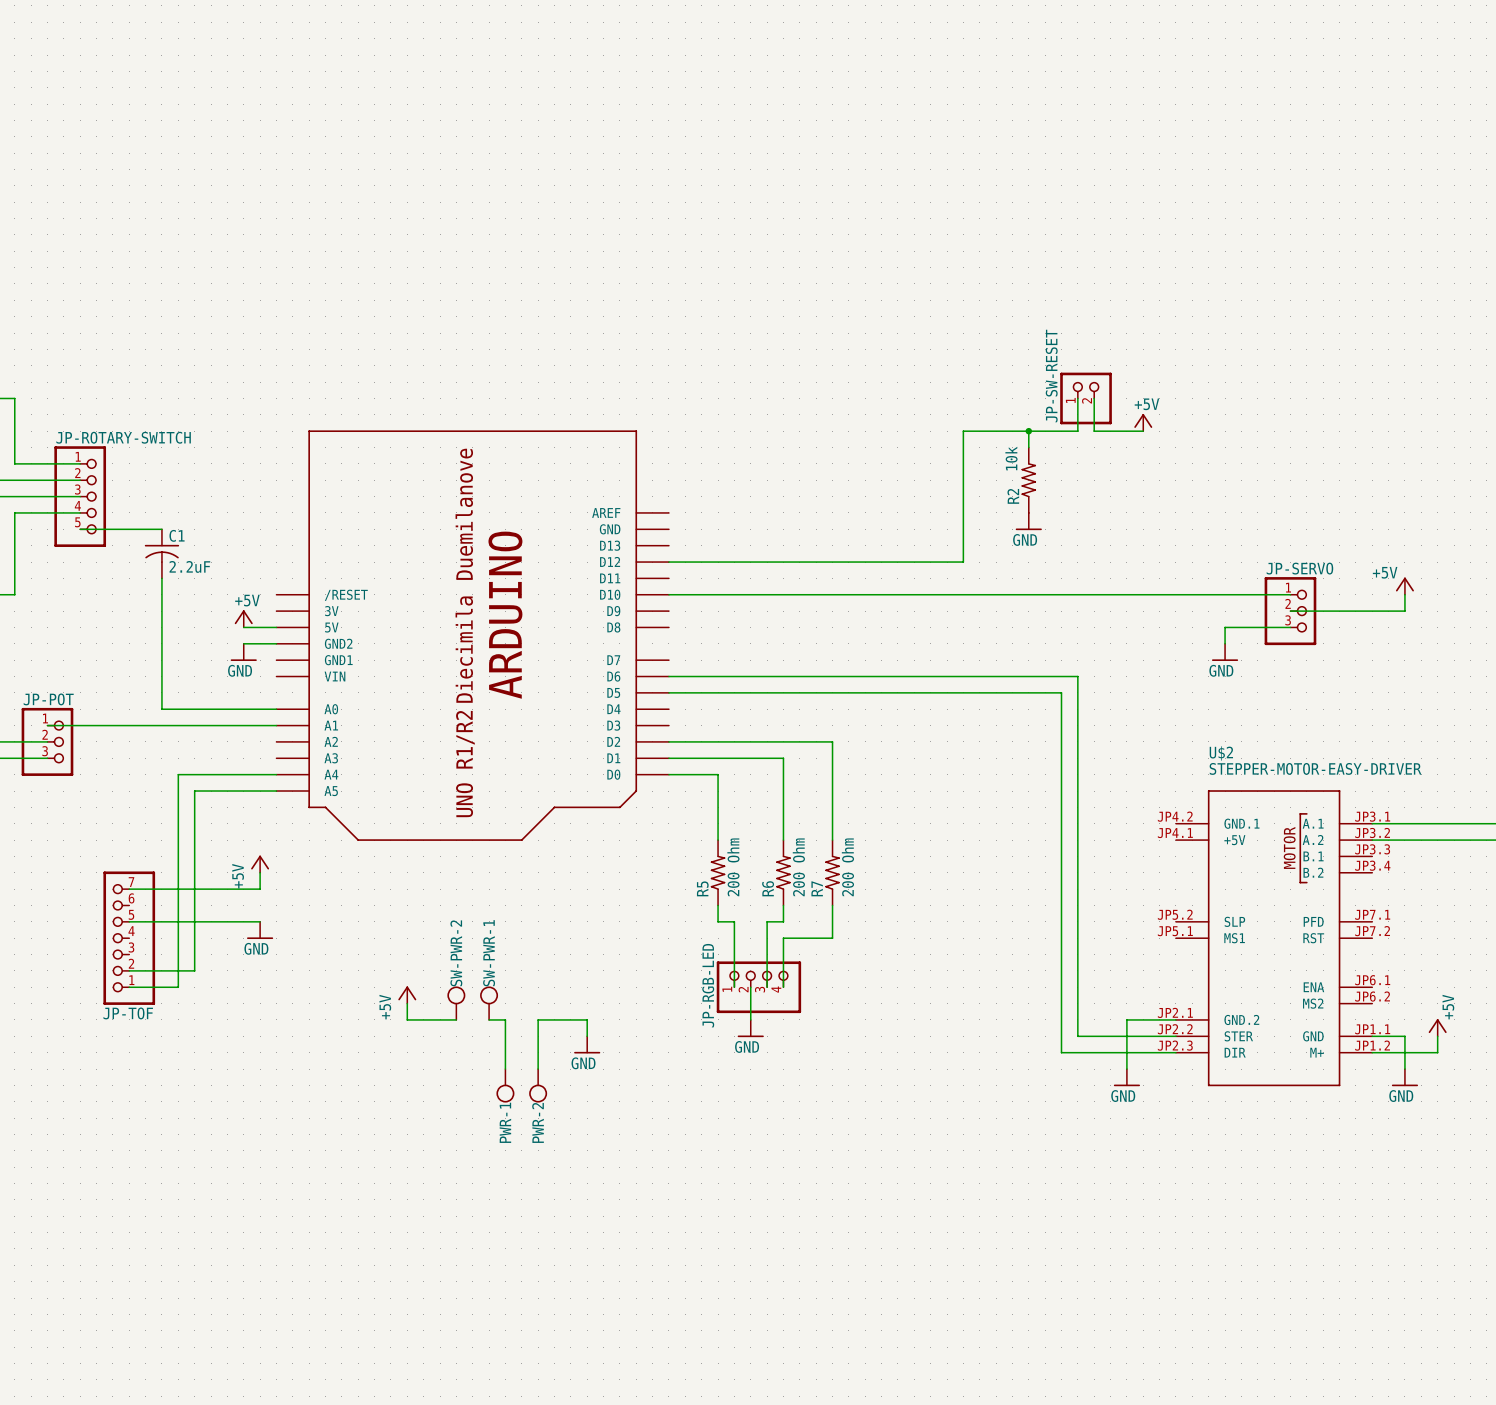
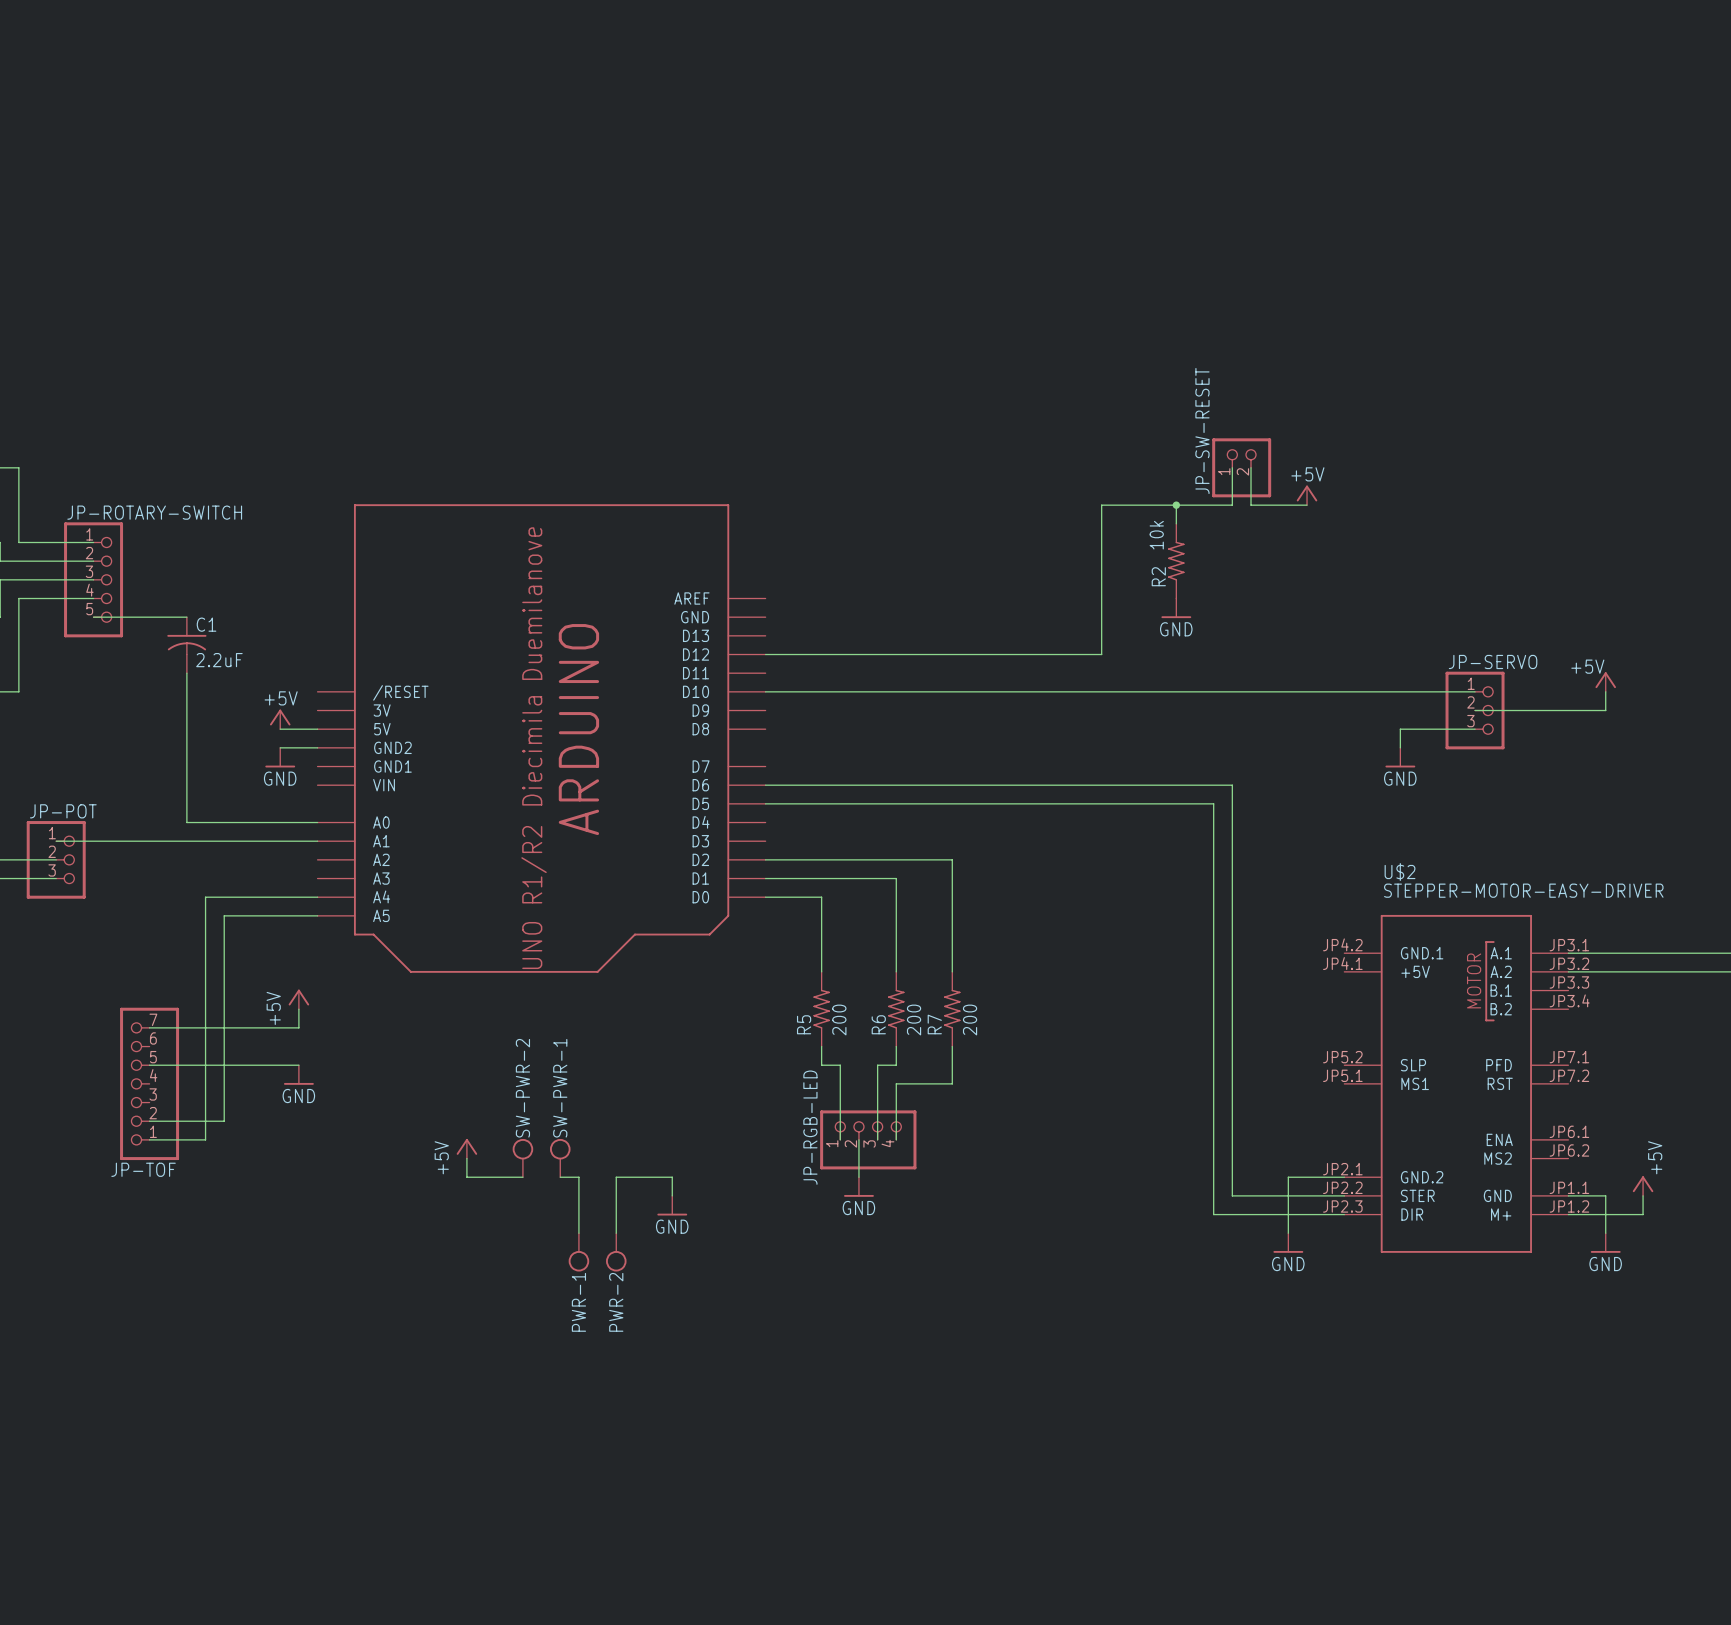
R5 value: 200 Ohm (733, 867) -> 200 (839, 1020)
R6 value: 200 Ohm (798, 867) -> 200 (914, 1020)
R7 value: 200 Ohm (847, 867) -> 200 (970, 1020)

